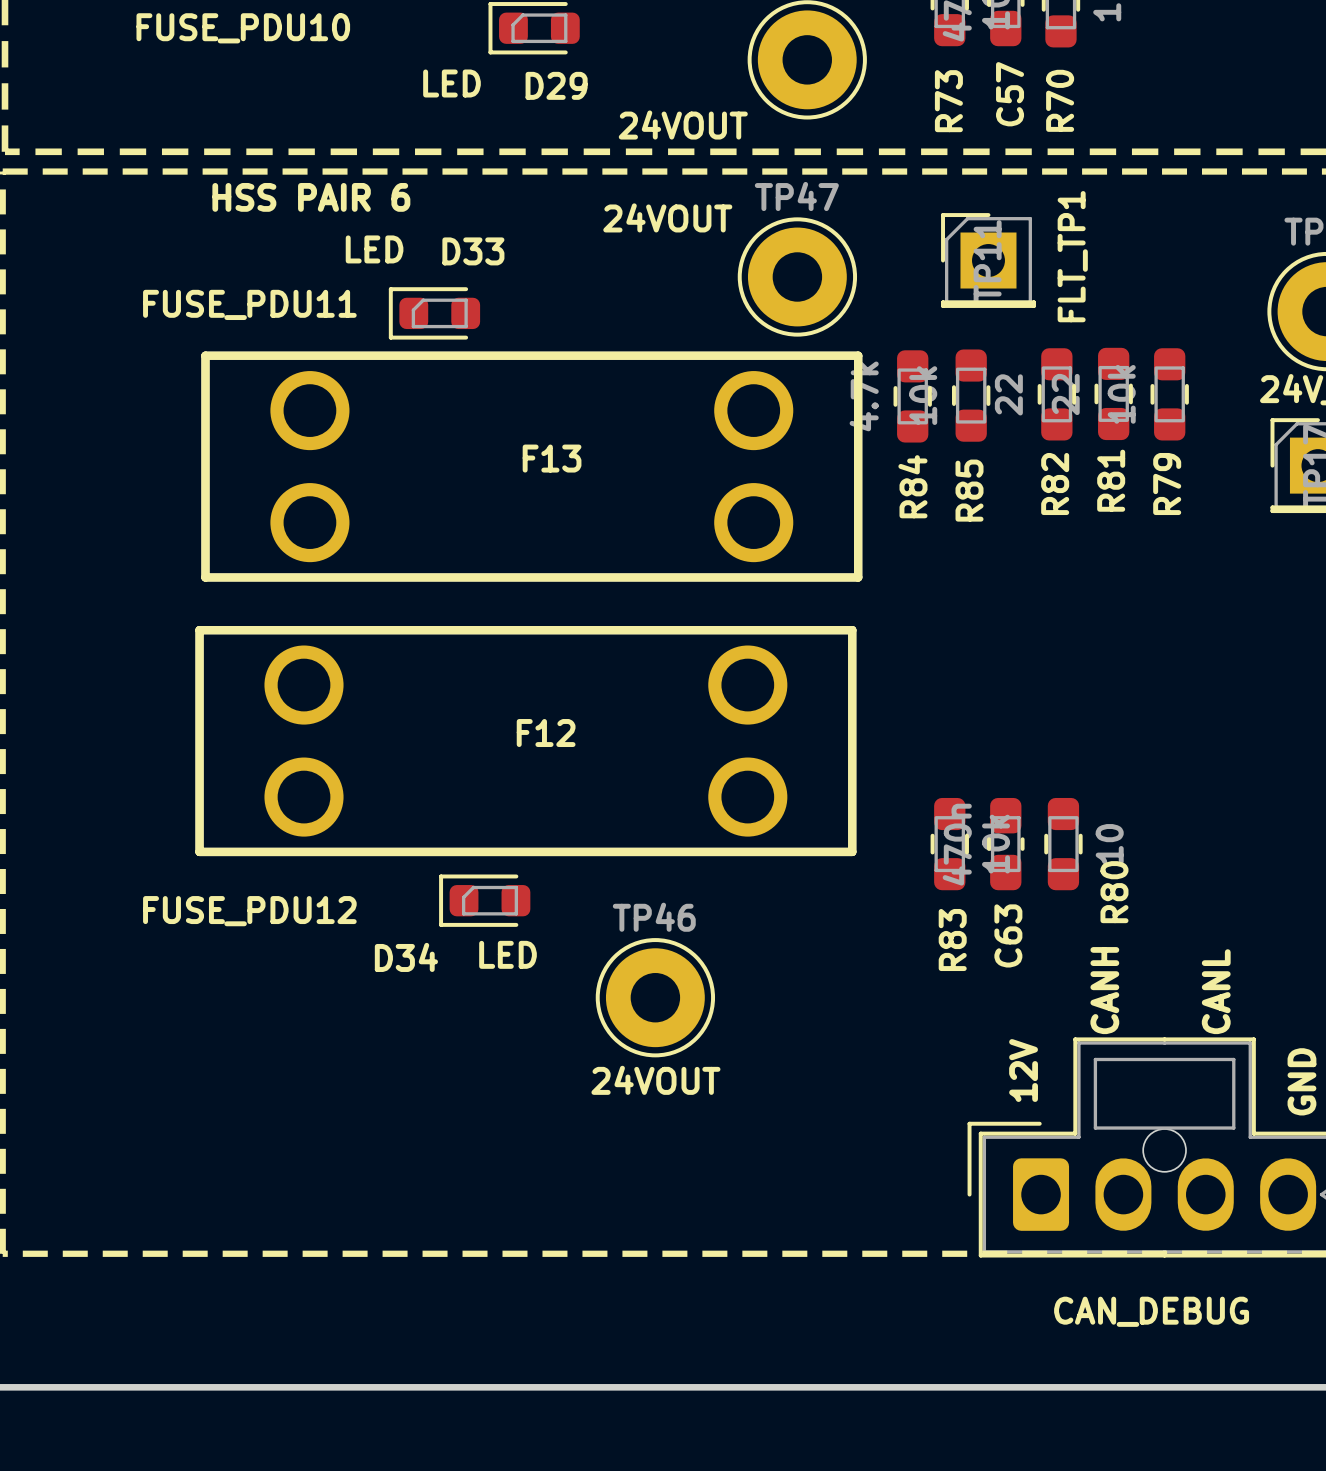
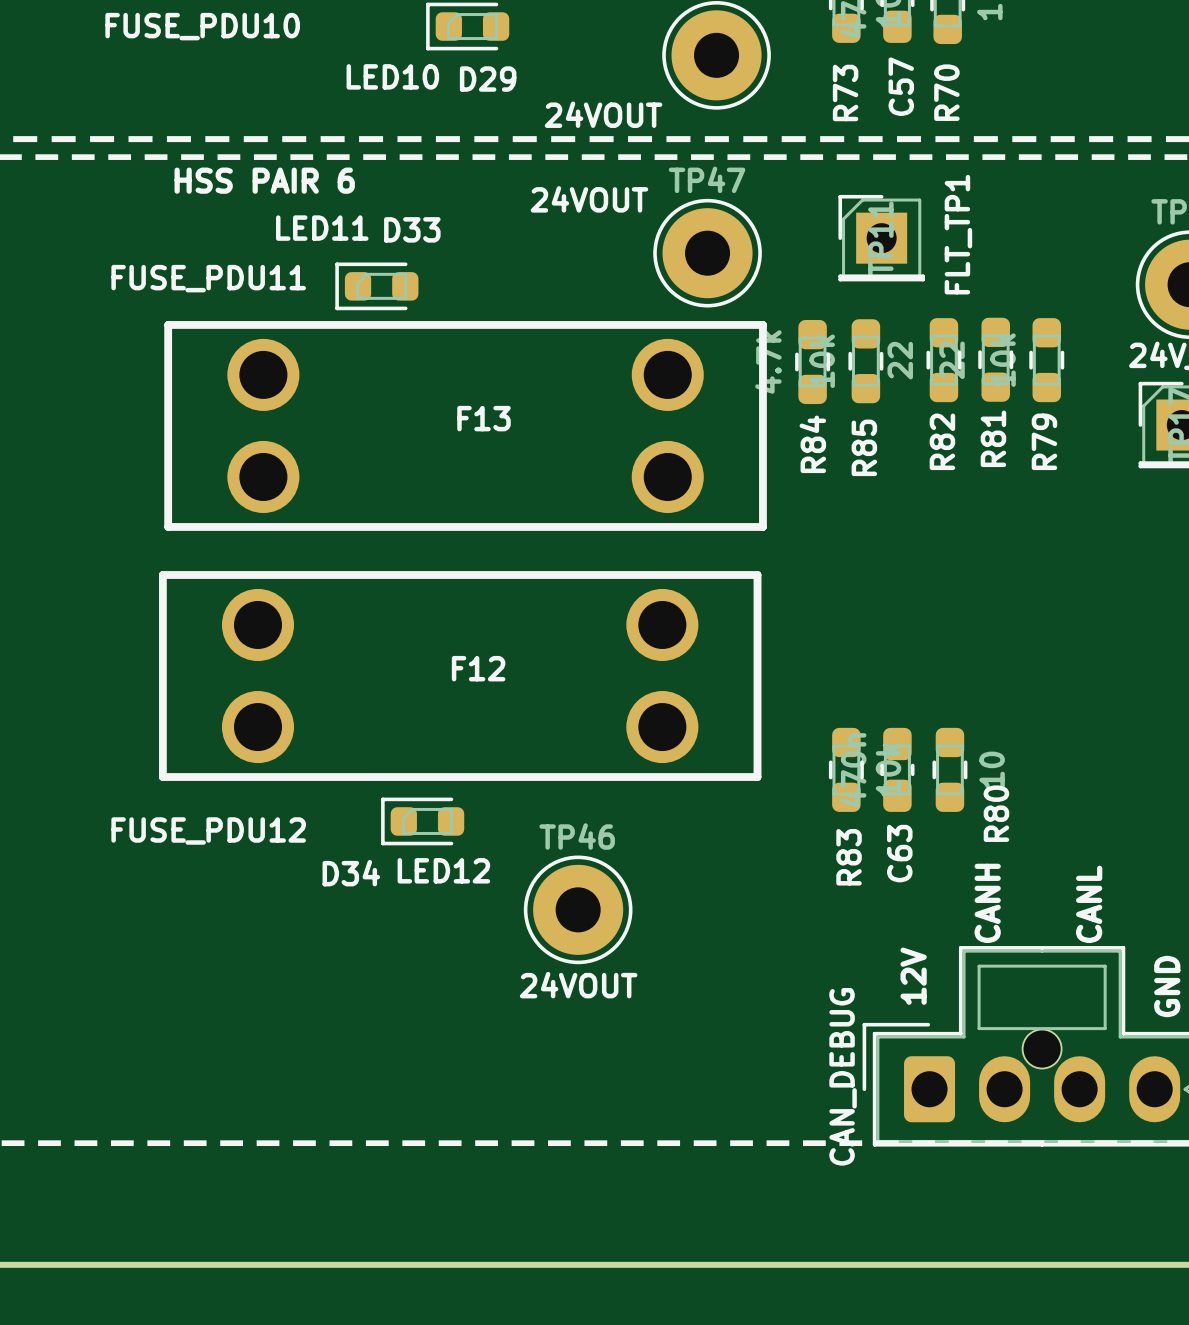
D29 value: LED (451, 83) -> LED10 (392, 76)
D33 value: LED (374, 249) -> LED11 (322, 228)
D34 value: LED (508, 954) -> LED12 (443, 870)
part value rotation: 0° (1151, 1311) -> 90° counterclockwise (843, 1076)
part value position: CAN_DEBUG (1151, 1311) -> CAN_DEBUG (843, 1076)

